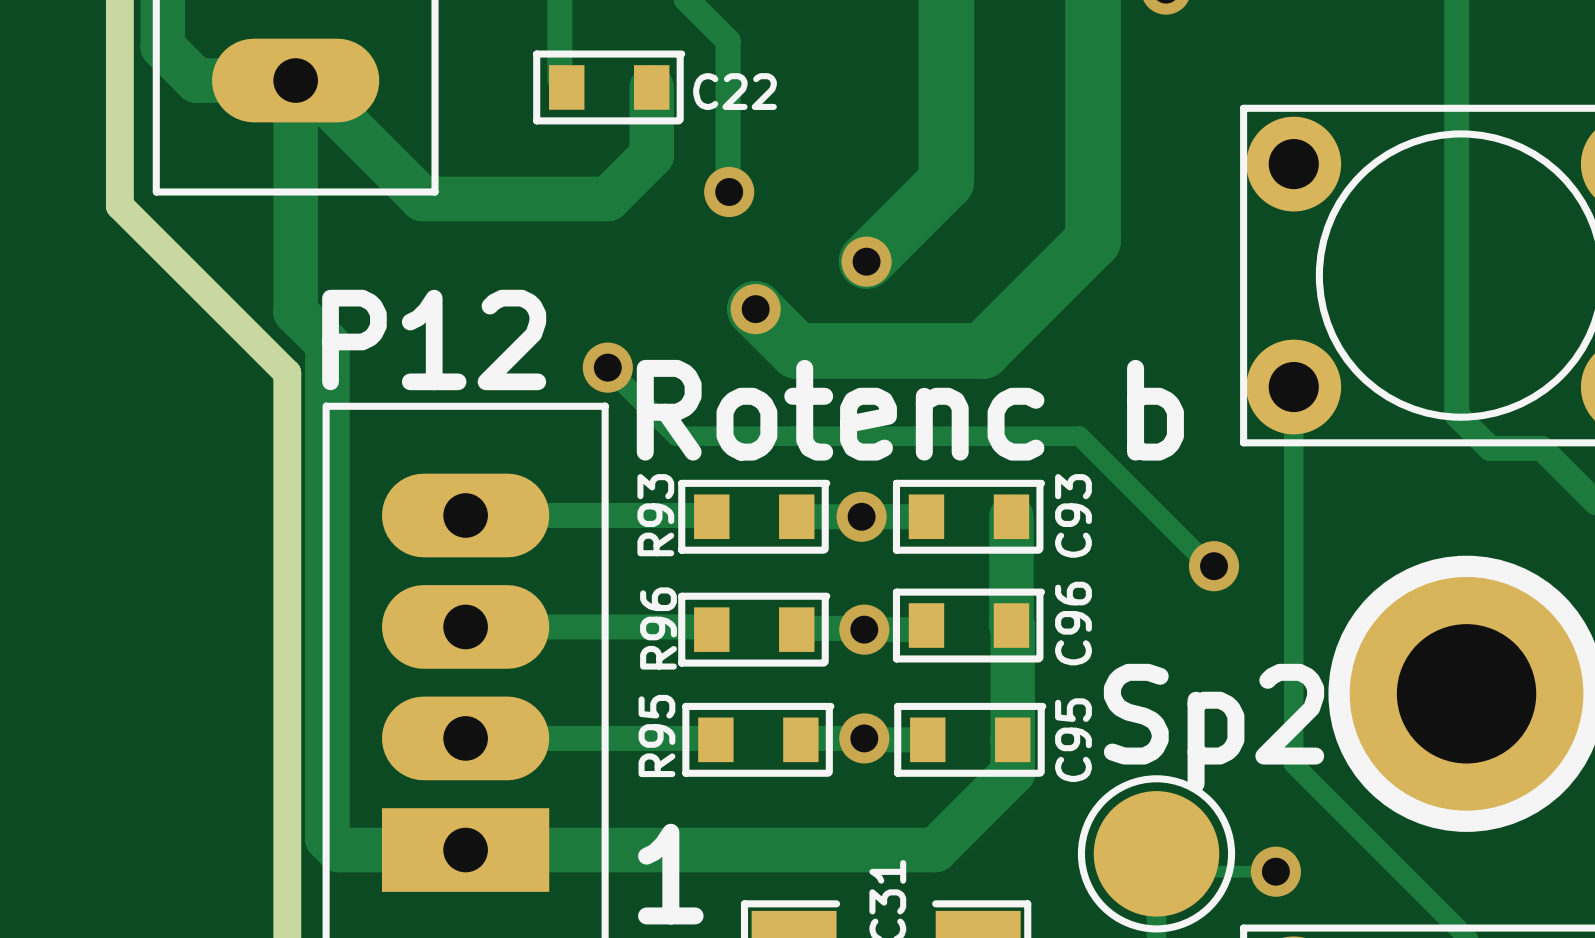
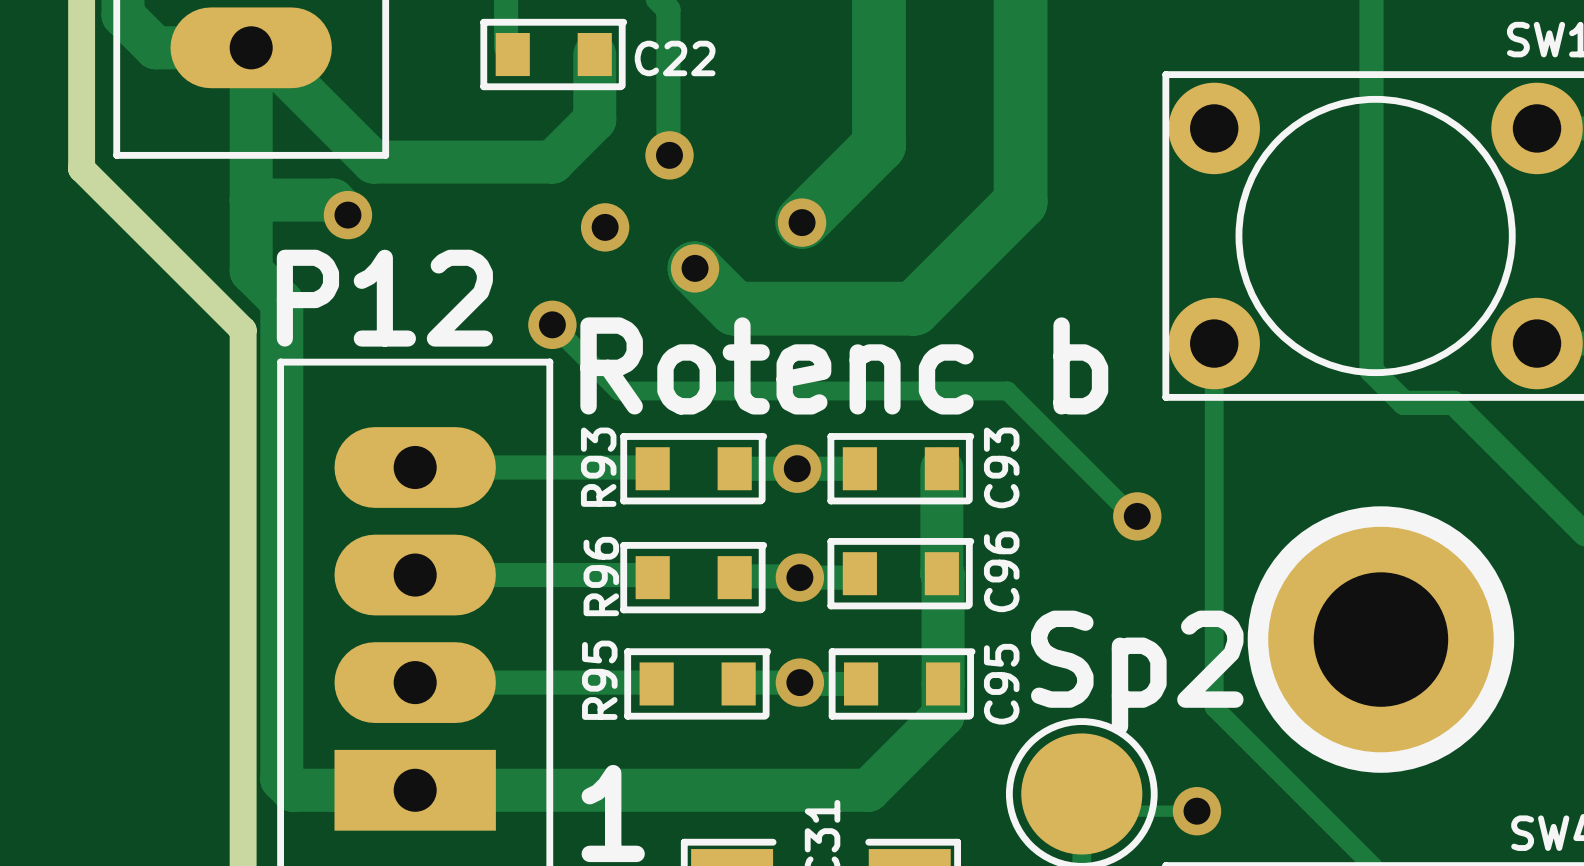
track: none -> (251, 200) (332, 200) (347, 215)
via: none -> (347, 215)
via: none -> (605, 227)

